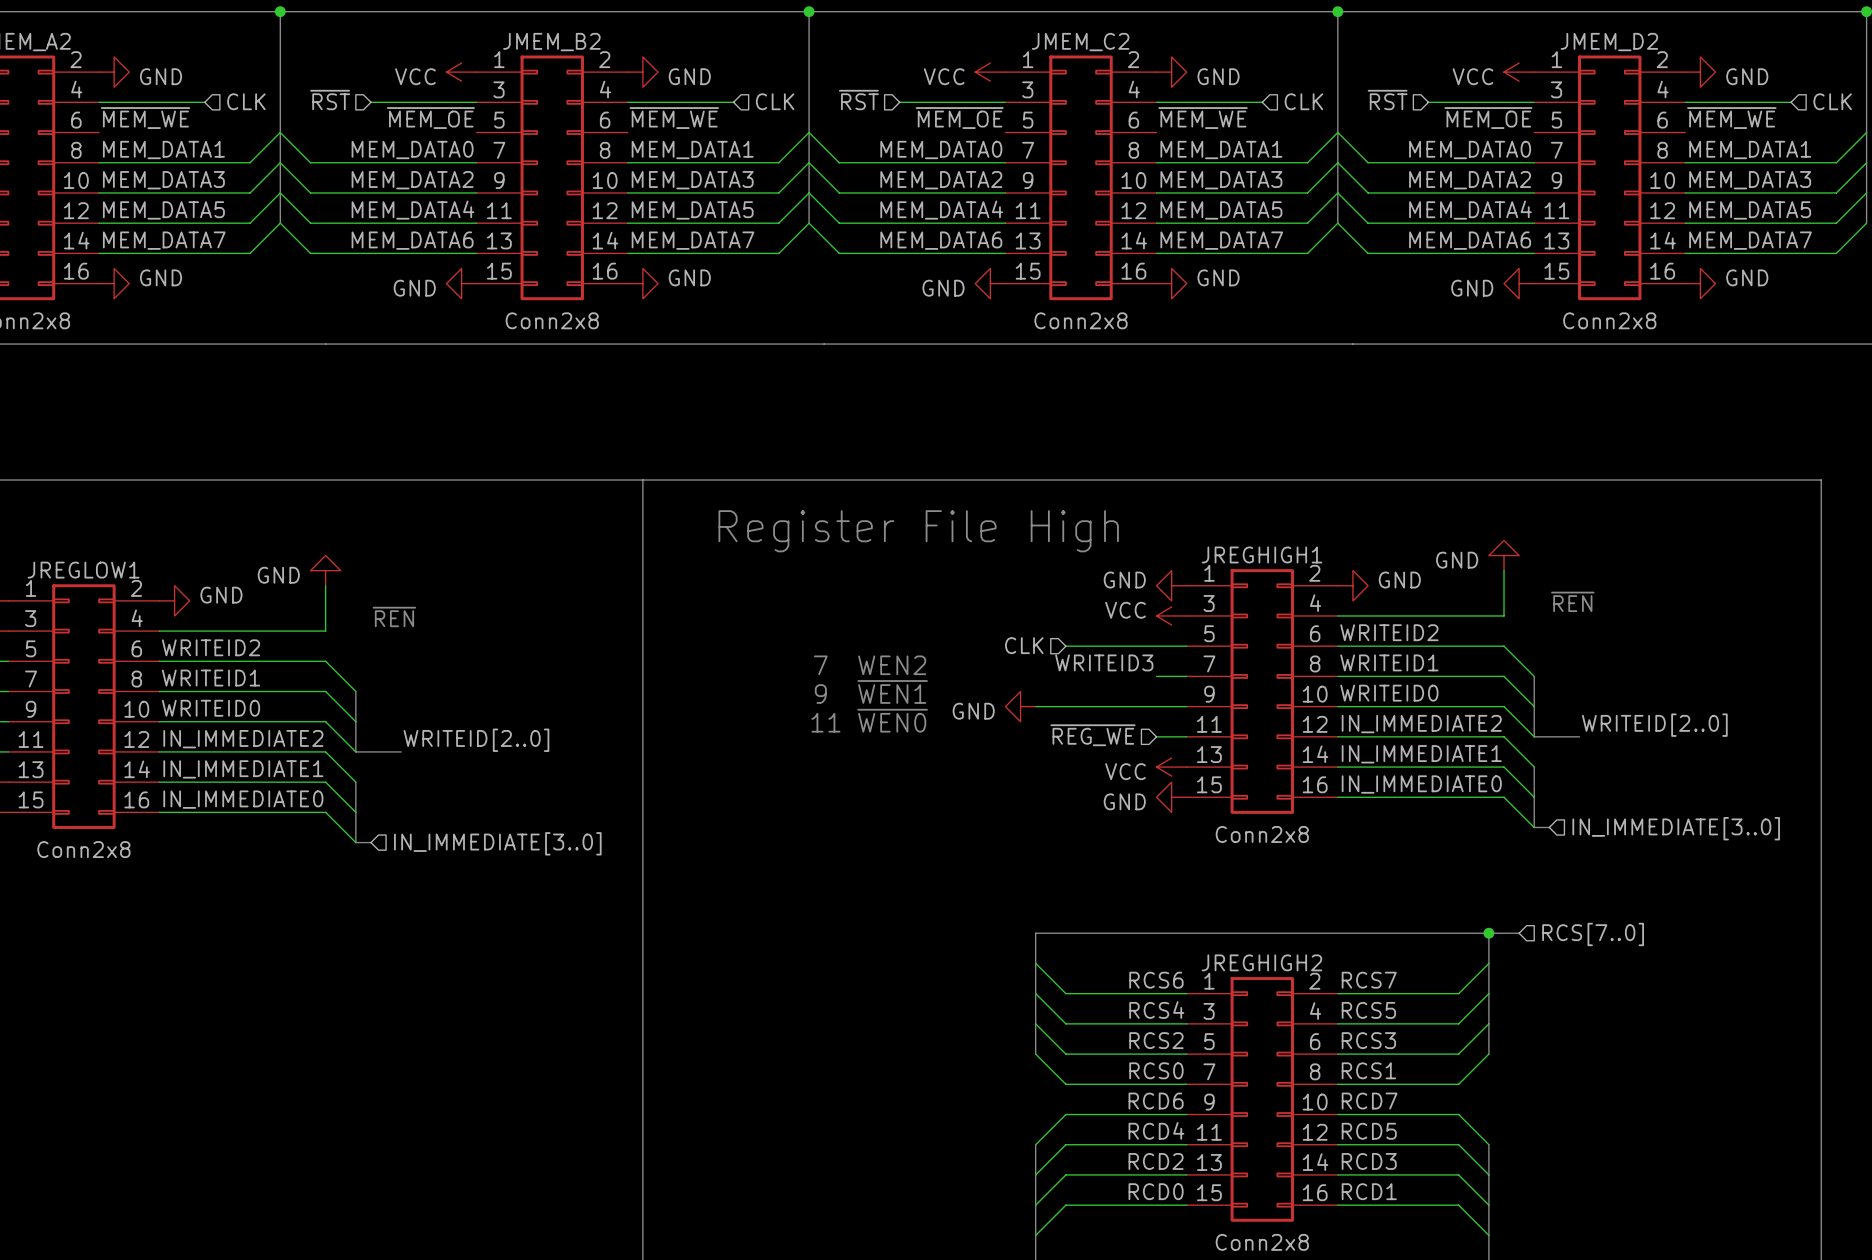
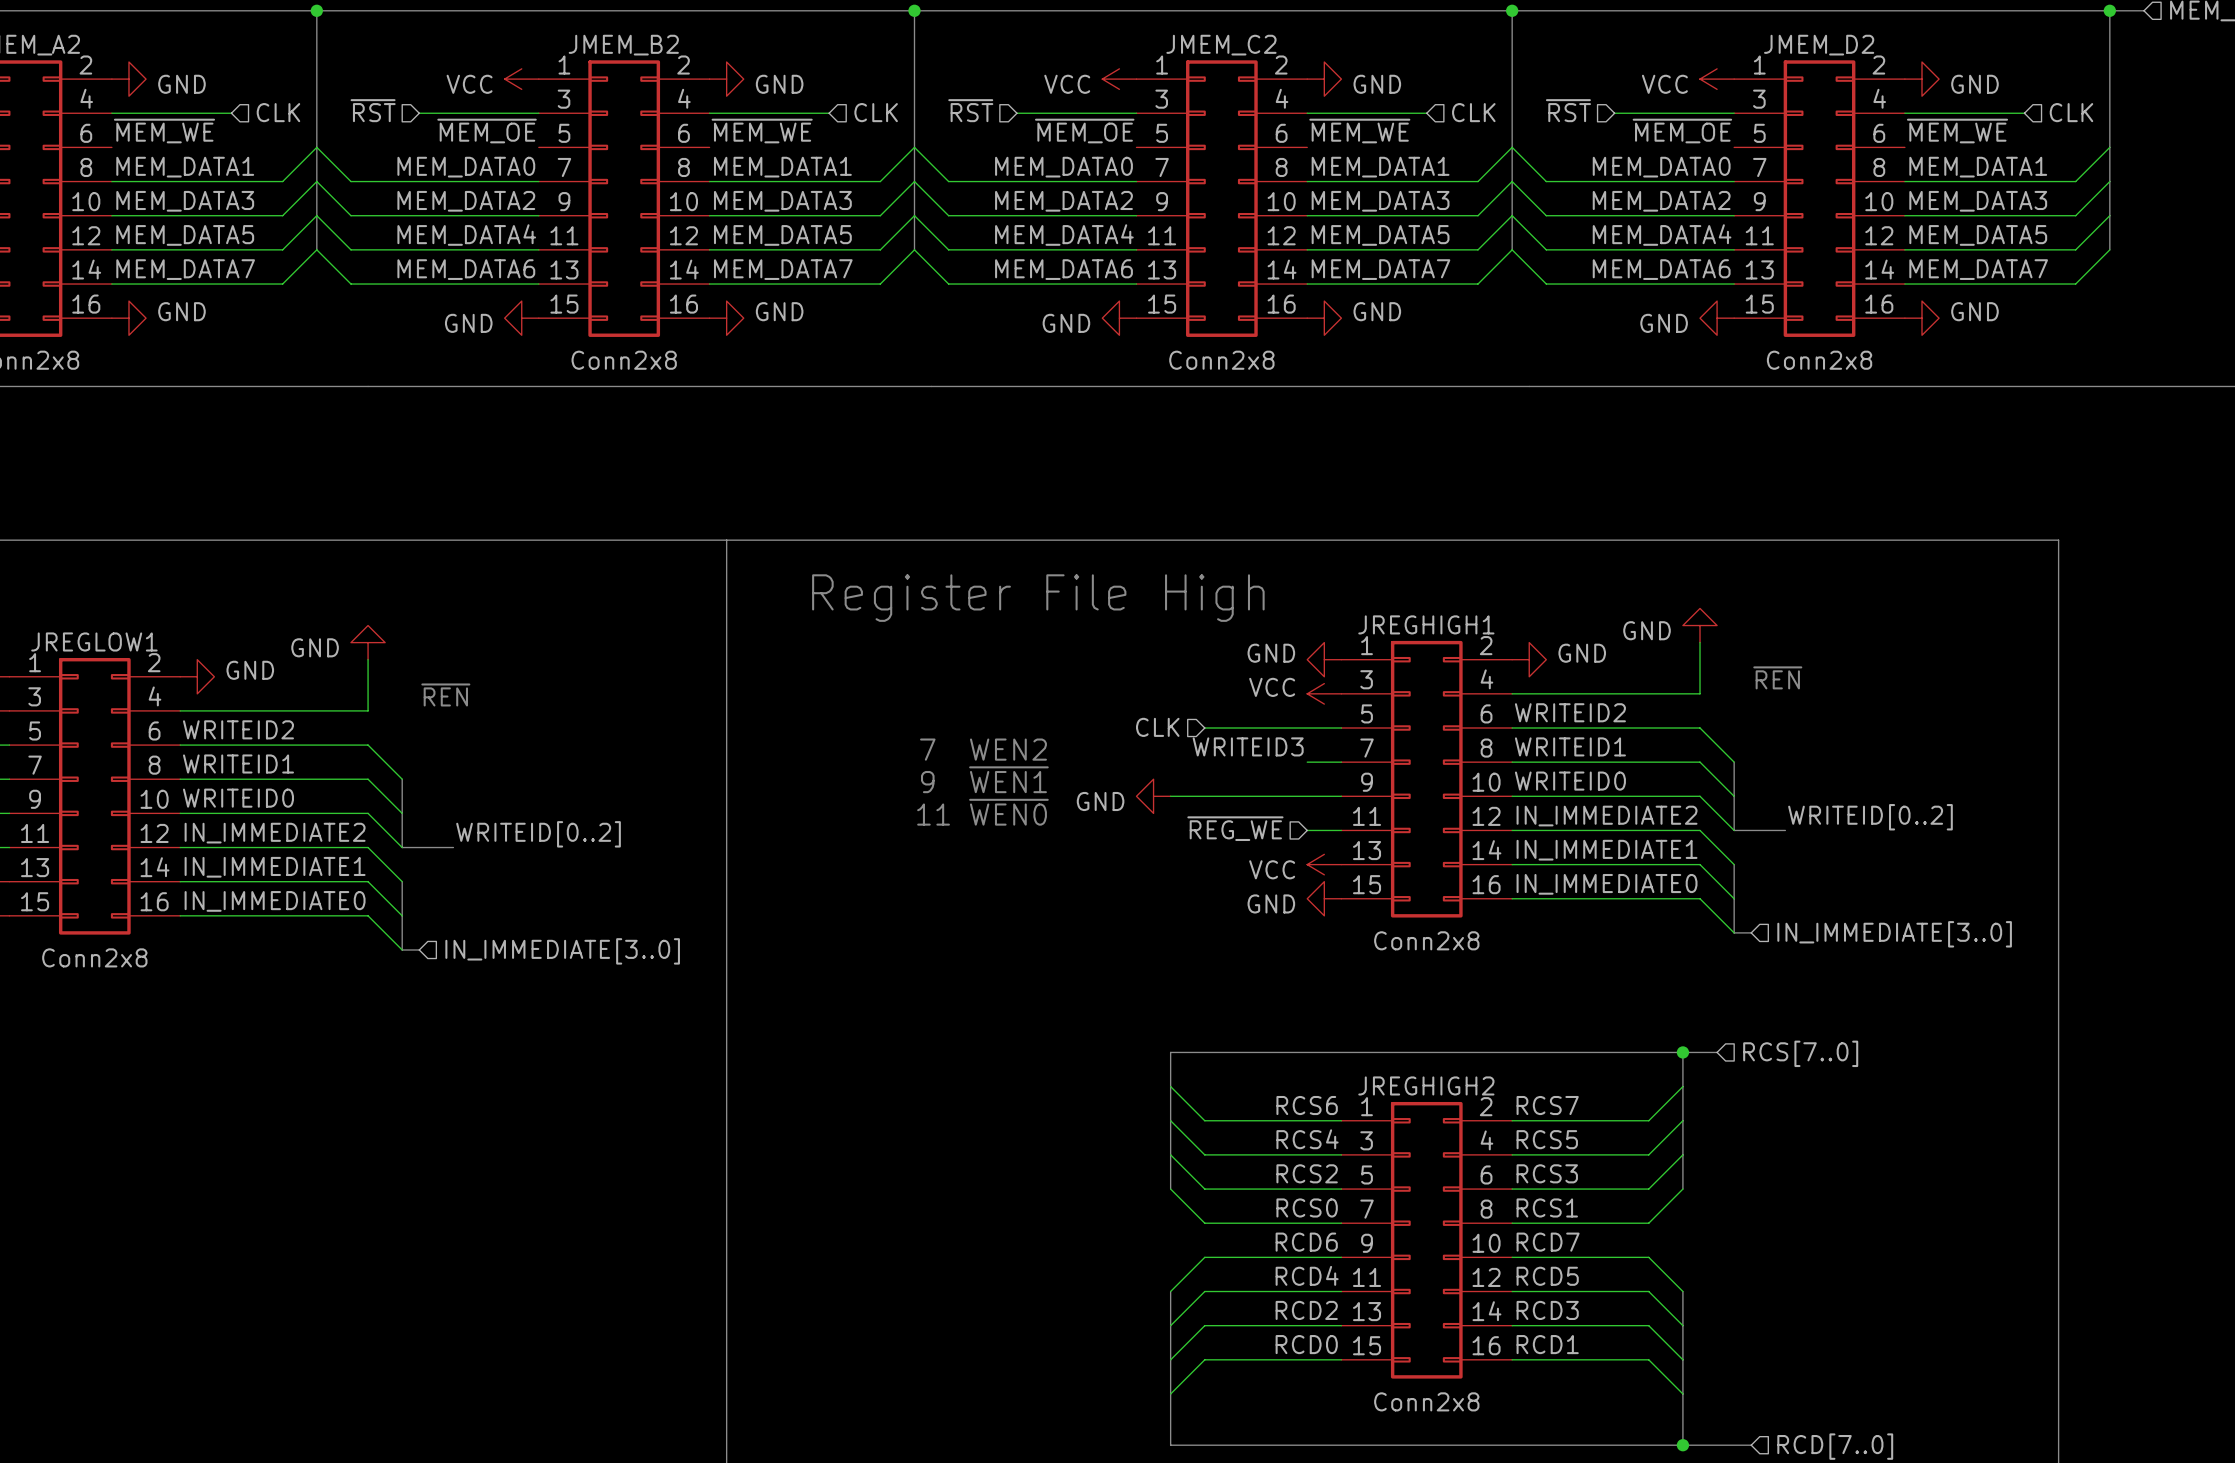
label: WRITEID[2..0] (1654, 725) -> WRITEID[0..2] (1870, 817)
label: WRITEID[2..0] (476, 740) -> WRITEID[0..2] (538, 834)

